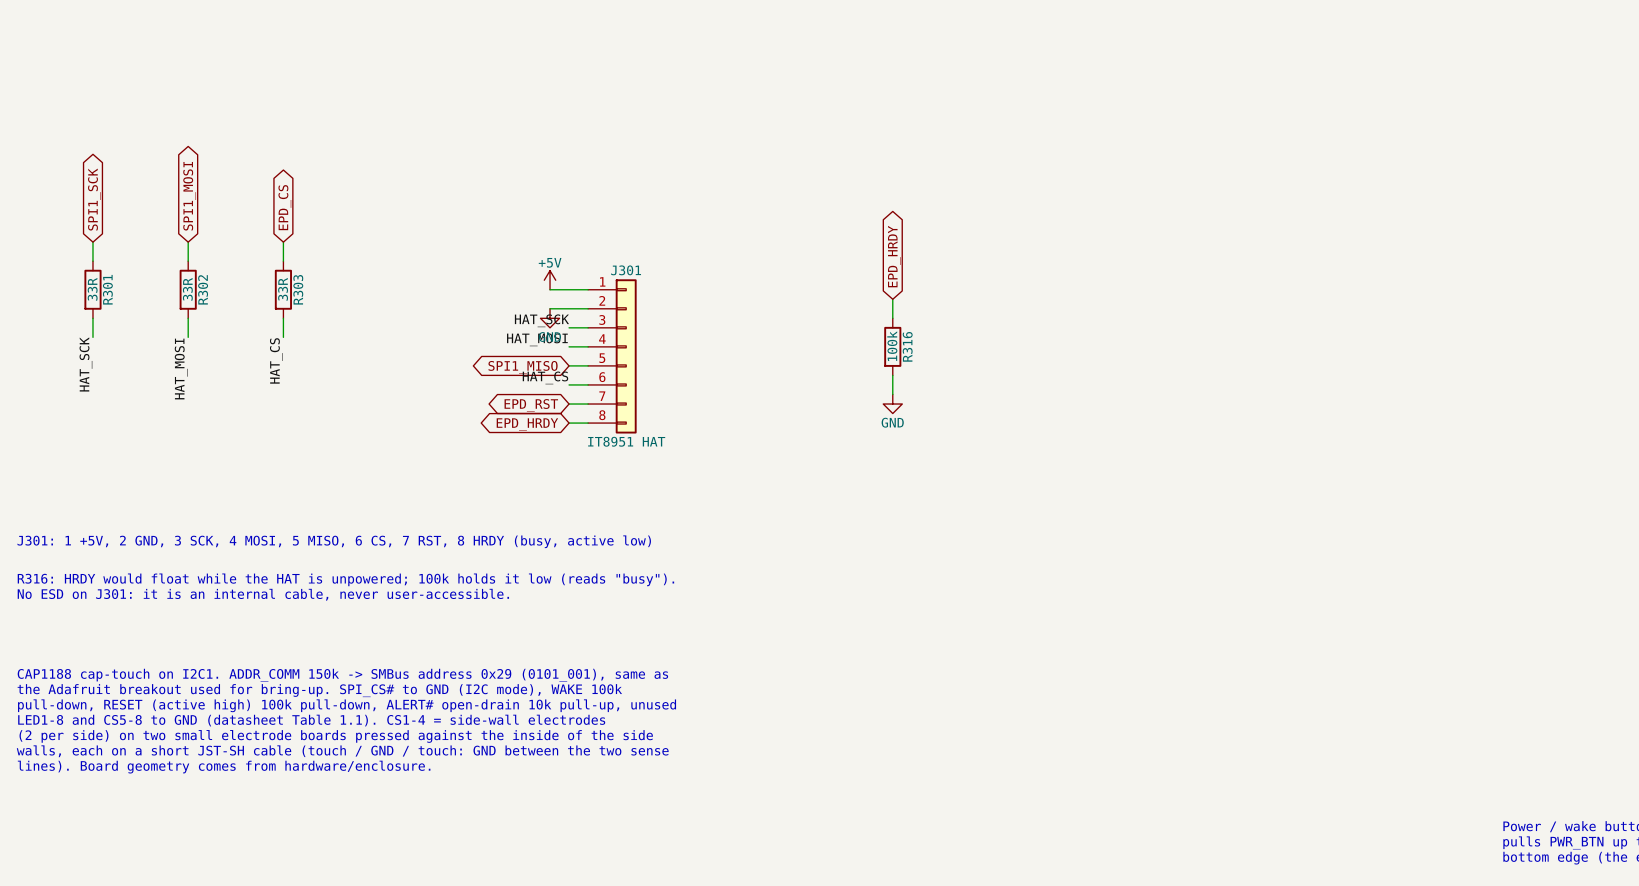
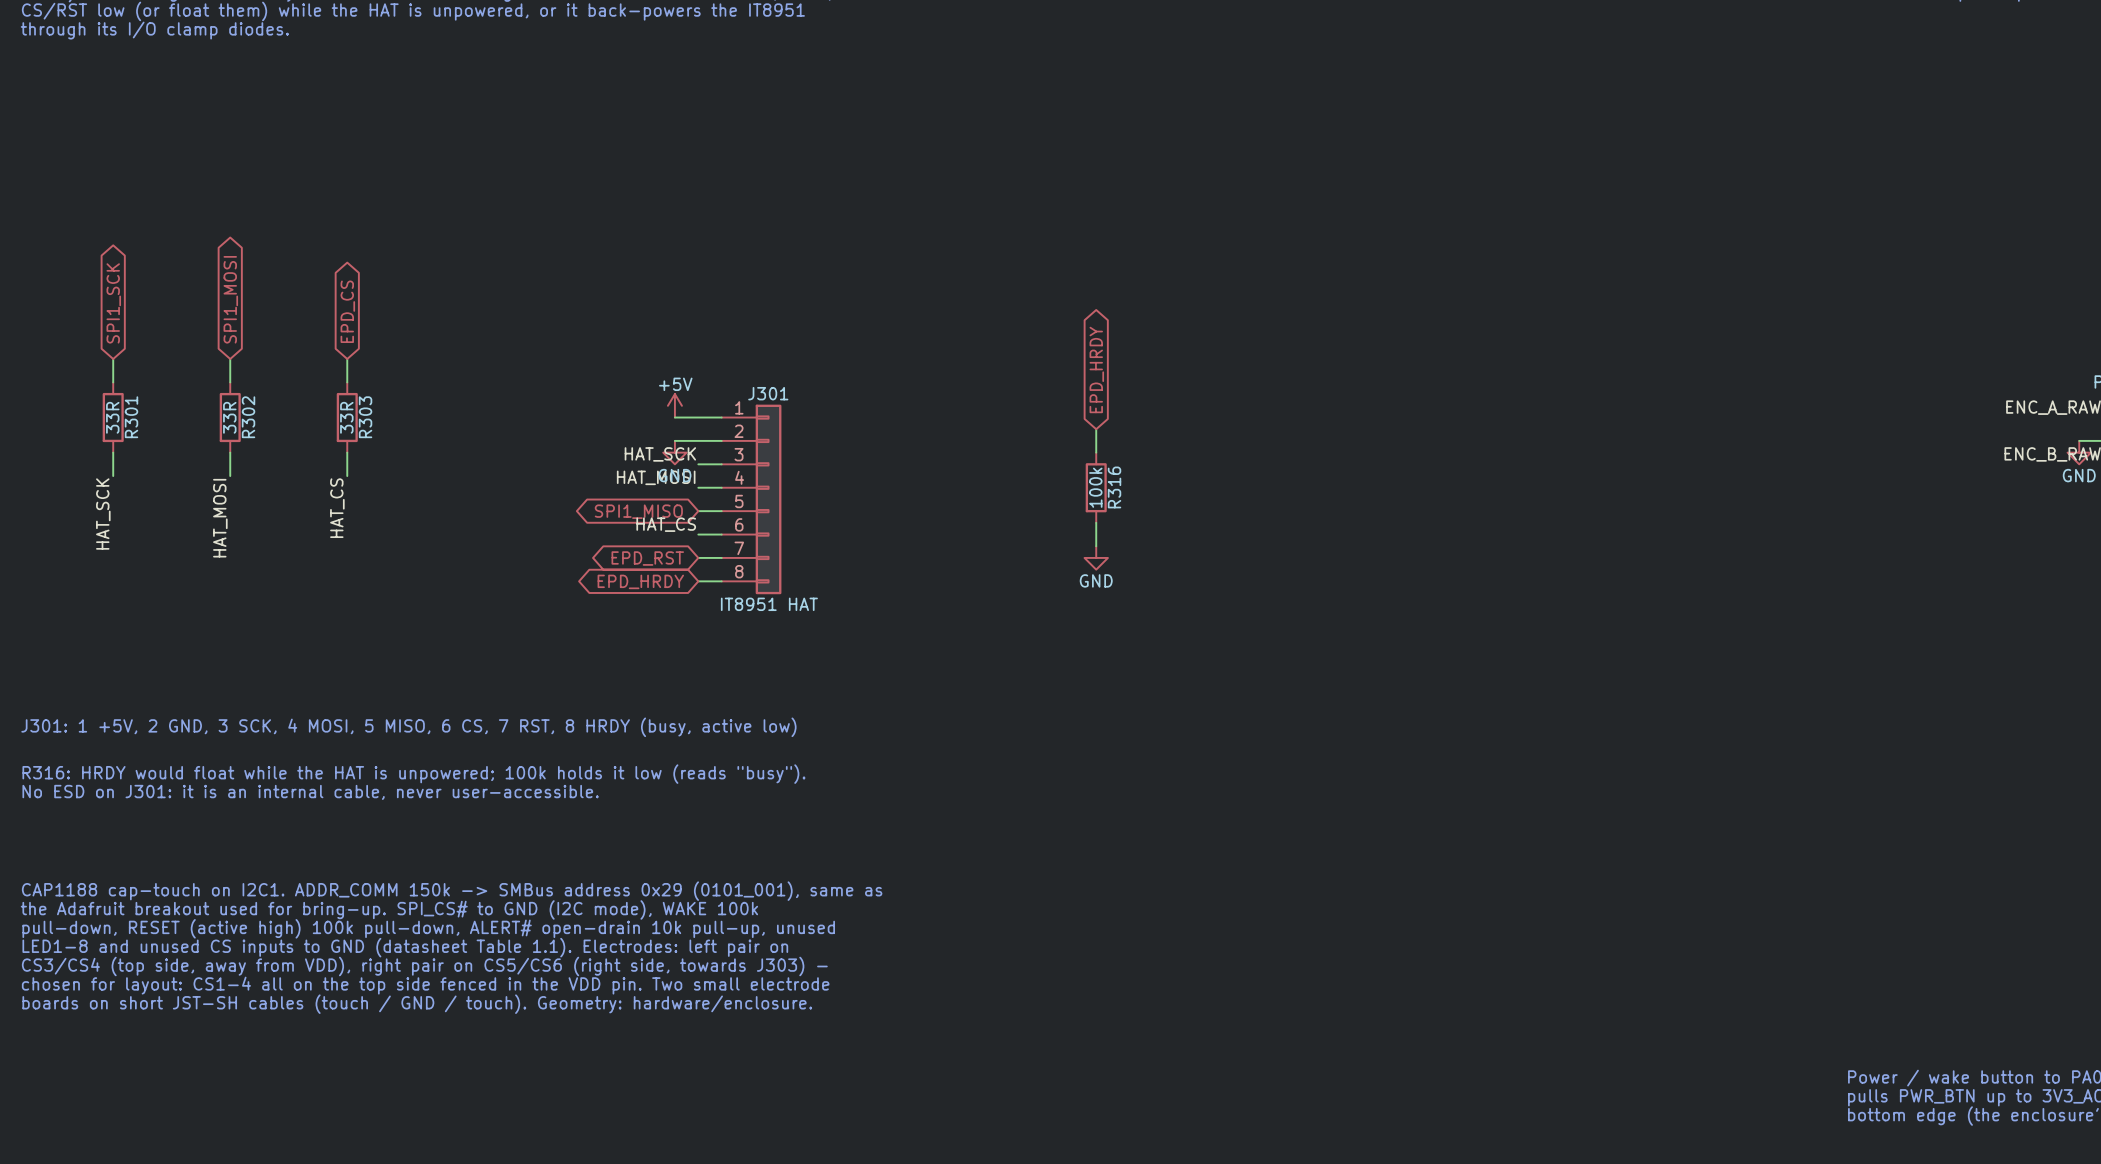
text: LED1-8 and CS5-8 to GND (datasheet Table 1.1). CS1-4 = side-wall electrodes (311, 720) -> LED1-8 and unused CS inputs to GND (datasheet Table 1.1). Electrodes: left pair on (405, 947)
text: (2 per side) on two small electrode boards pressed against the inside of the side (336, 736) -> CS3/CS4 (top side, away from VDD), right pair on CS5/CS6 (right side, towards J303) - (424, 966)
text: walls, each on a short JST-SH cable (touch / GND / touch: GND between the two sense (342, 751) -> chosen for layout: CS1-4 all on the top side fenced in the VDD pin. Two small electrode (425, 985)
text: lines). Board geometry comes from hardware/enclosure. (224, 767) -> boards on short JST-SH cables (touch / GND / touch). Geometry: hardware/enclosure. (417, 1004)

